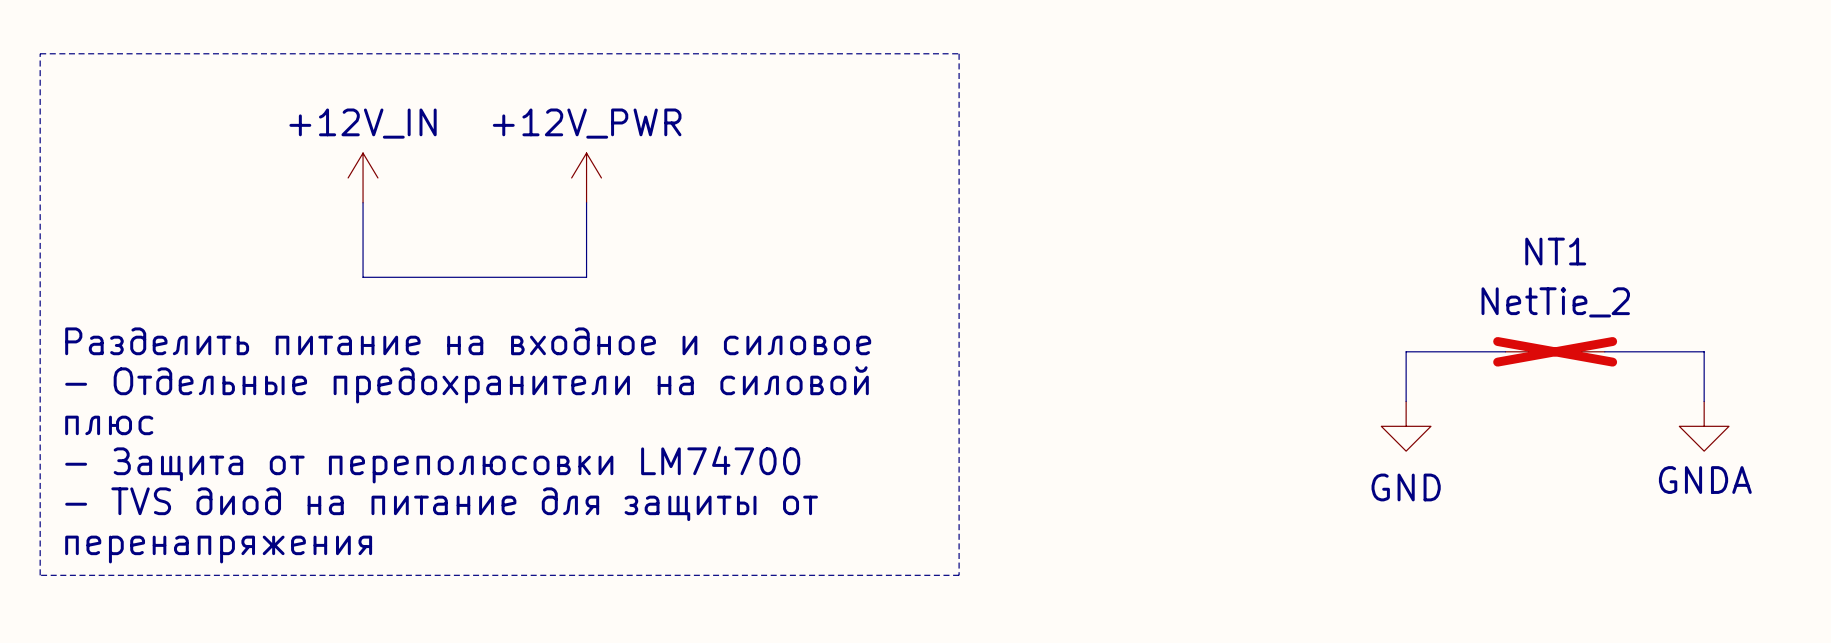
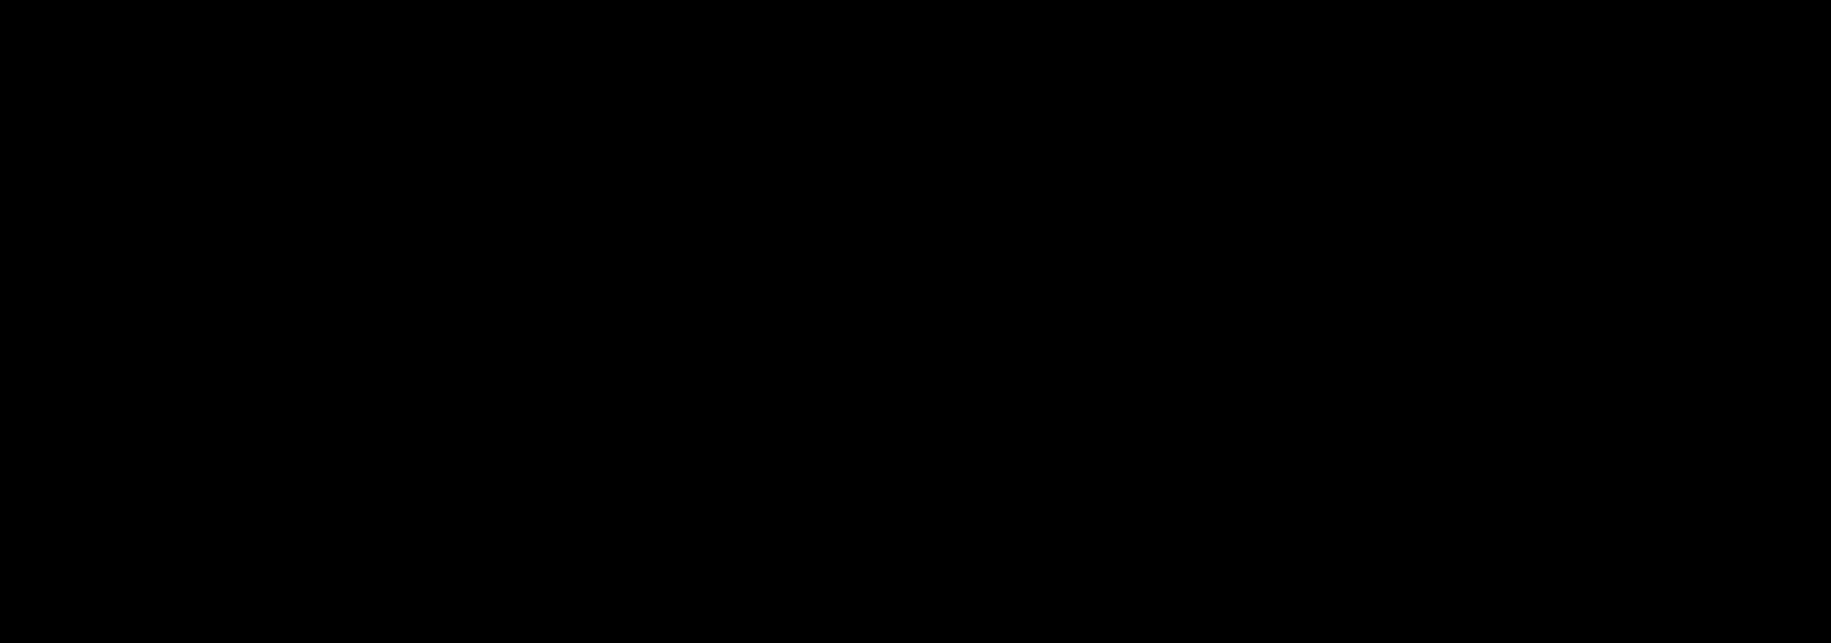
line: (40, 53) (959, 53) (959, 575) (40, 575) (40, 53) -> none
power symbol: +12V_IN (363, 177) -> none
power symbol: +12V_PWR (586, 177) -> none
wire: (363, 202) (363, 277) (586, 277) (586, 202) -> none
text: Разделить питание на входное и силовое (468, 341) -> none
wire: (1505, 351) (1406, 351) (1406, 401) -> none
NT1: NetTie_2 (1555, 351) -> none
wire: (1604, 351) (1704, 351) (1704, 401) -> none
text: - Отдельные предохранители на силовой (466, 384) -> none
text: плюс (109, 425) -> none
power symbol: GND (1406, 426) -> none
power symbol: GNDA (1704, 426) -> none
text: - Защита от переполюсовки LM74700 (432, 464) -> none
text: - TVS диод на питание для защиты от (441, 504) -> none
text: перенапряжения (218, 549) -> none

